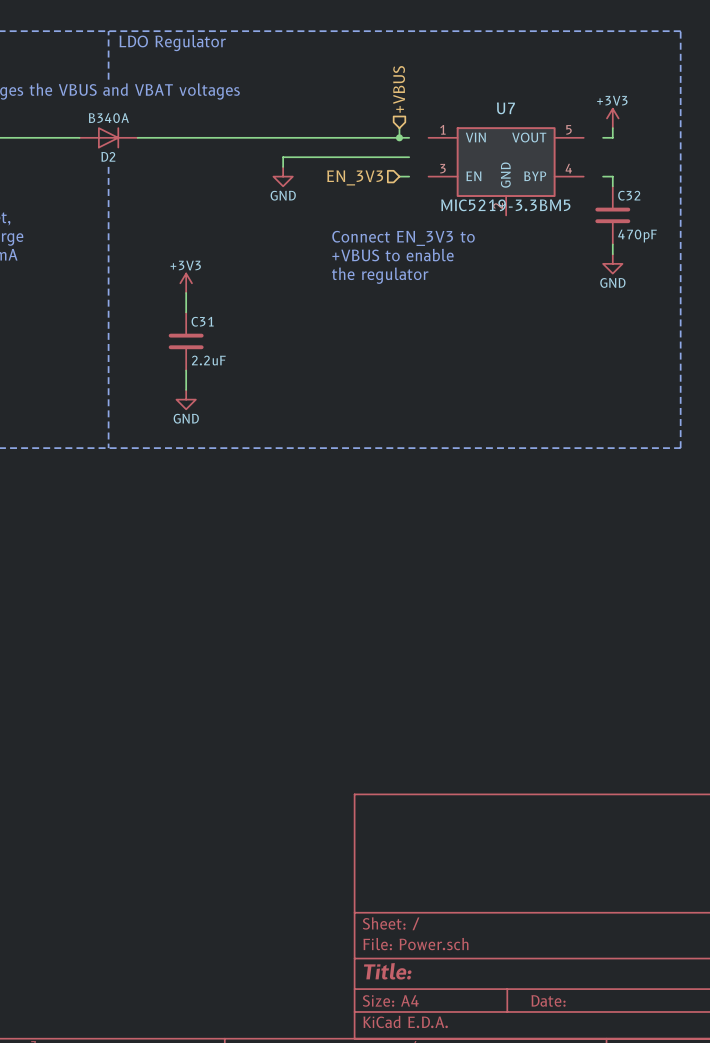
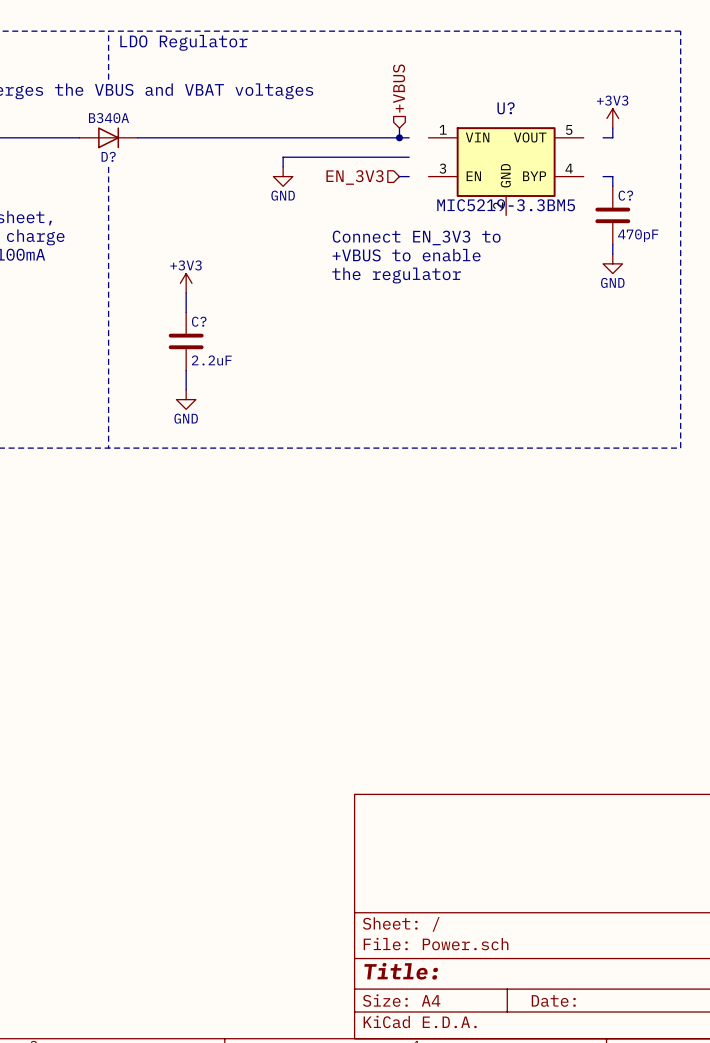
U7 name: U7 (505, 108) -> U? (506, 108)
D2 name: D2 (108, 156) -> D? (108, 156)
C32 name: C32 (629, 195) -> C? (625, 195)
C31 name: C31 (202, 321) -> C? (199, 321)

